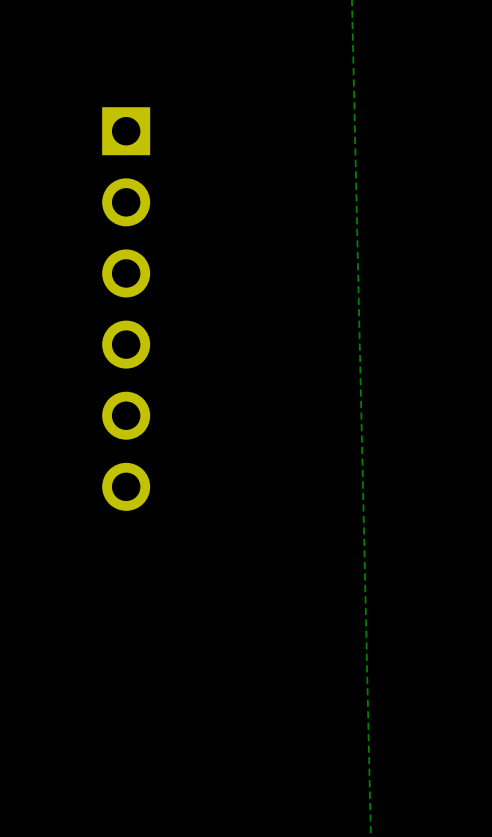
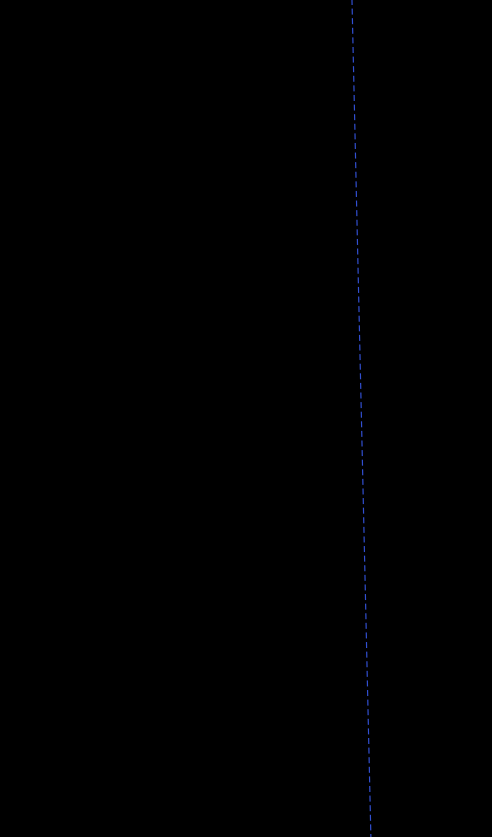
part: (126, 309) -> none

